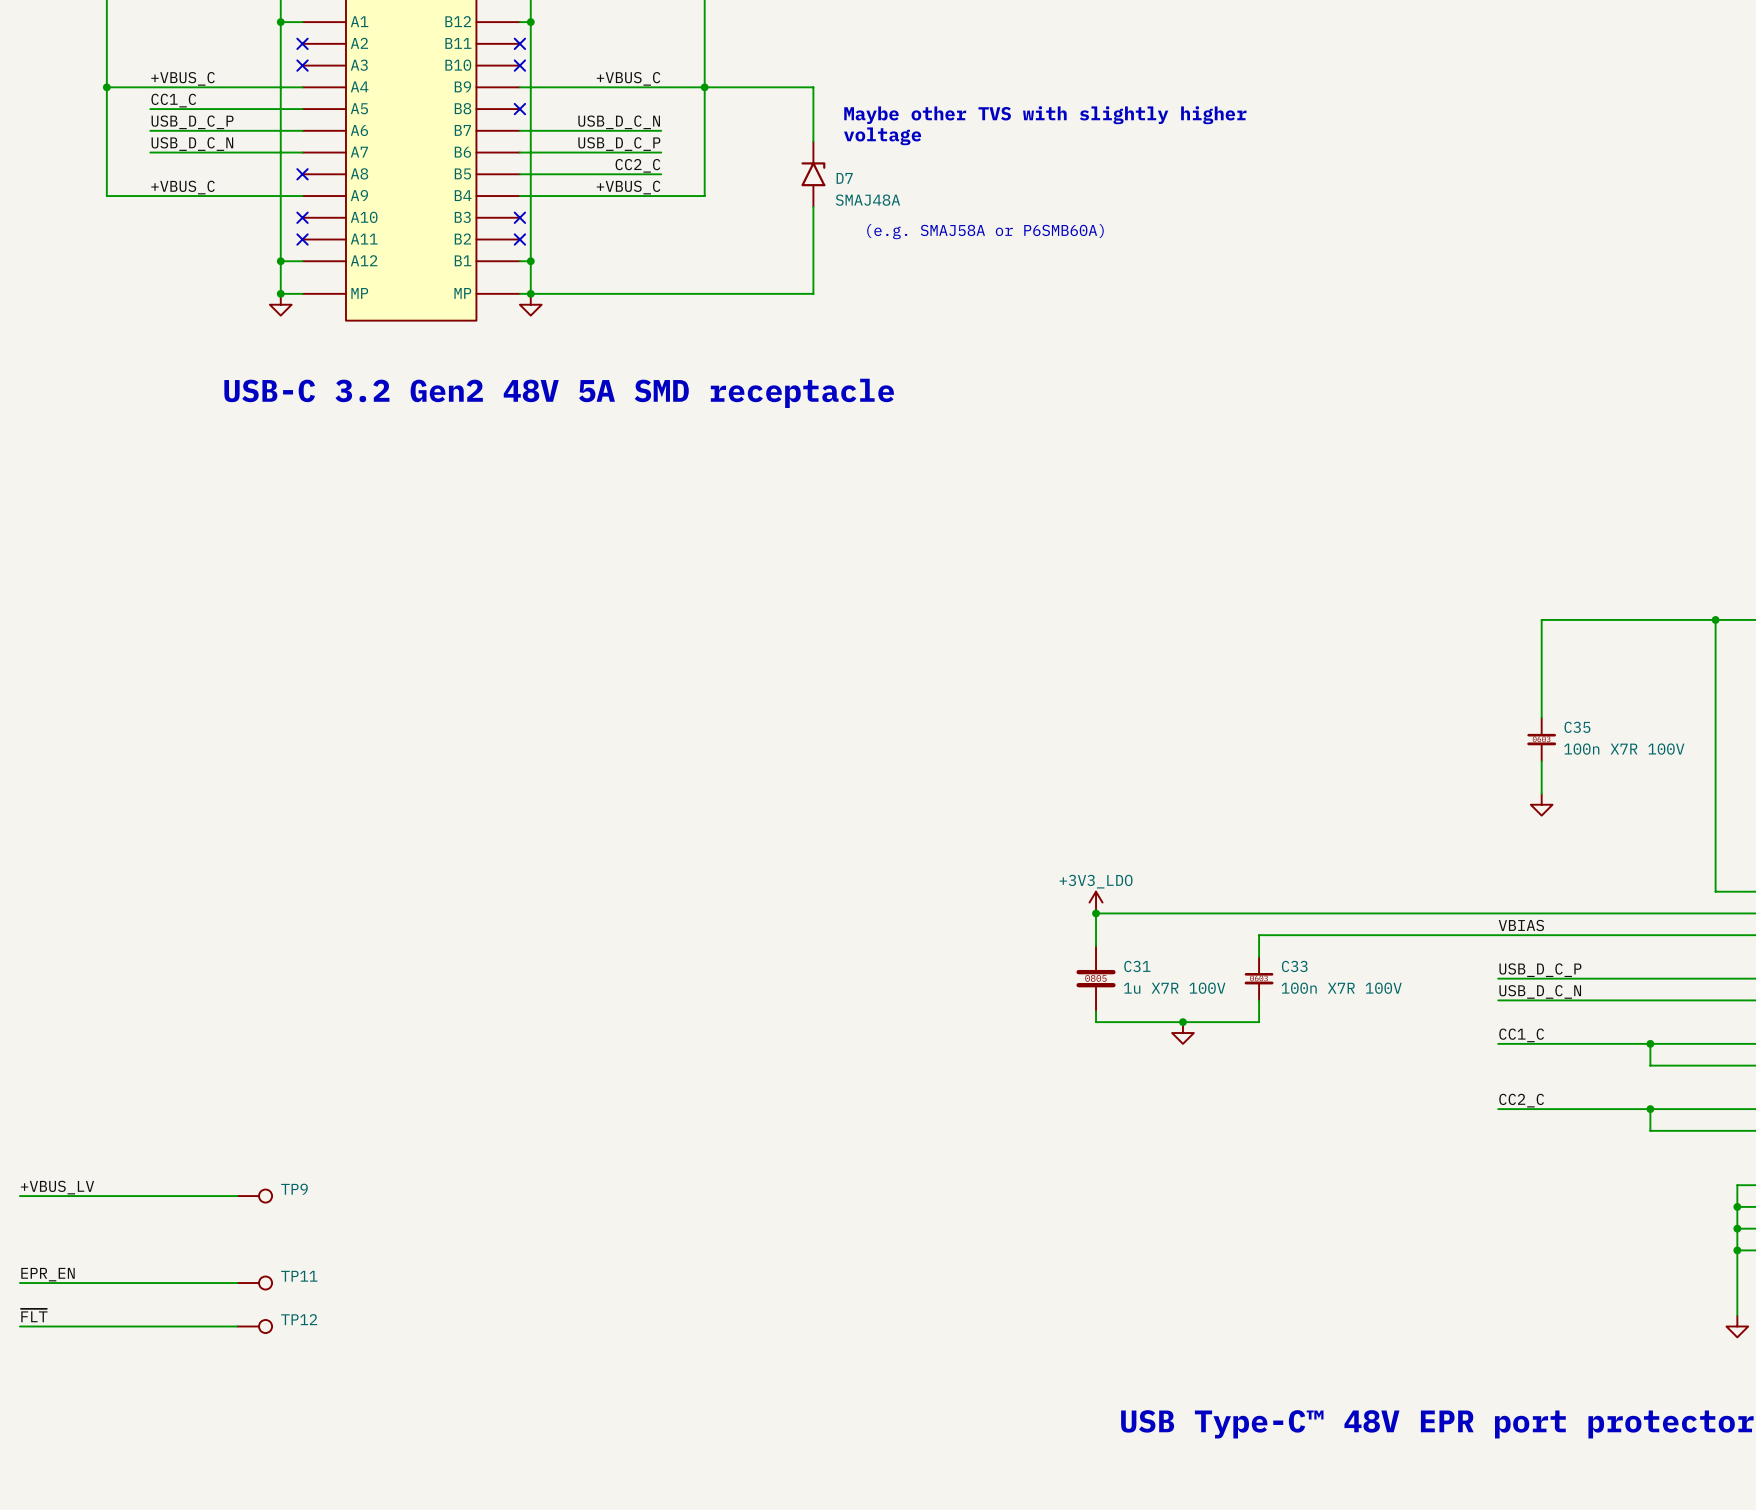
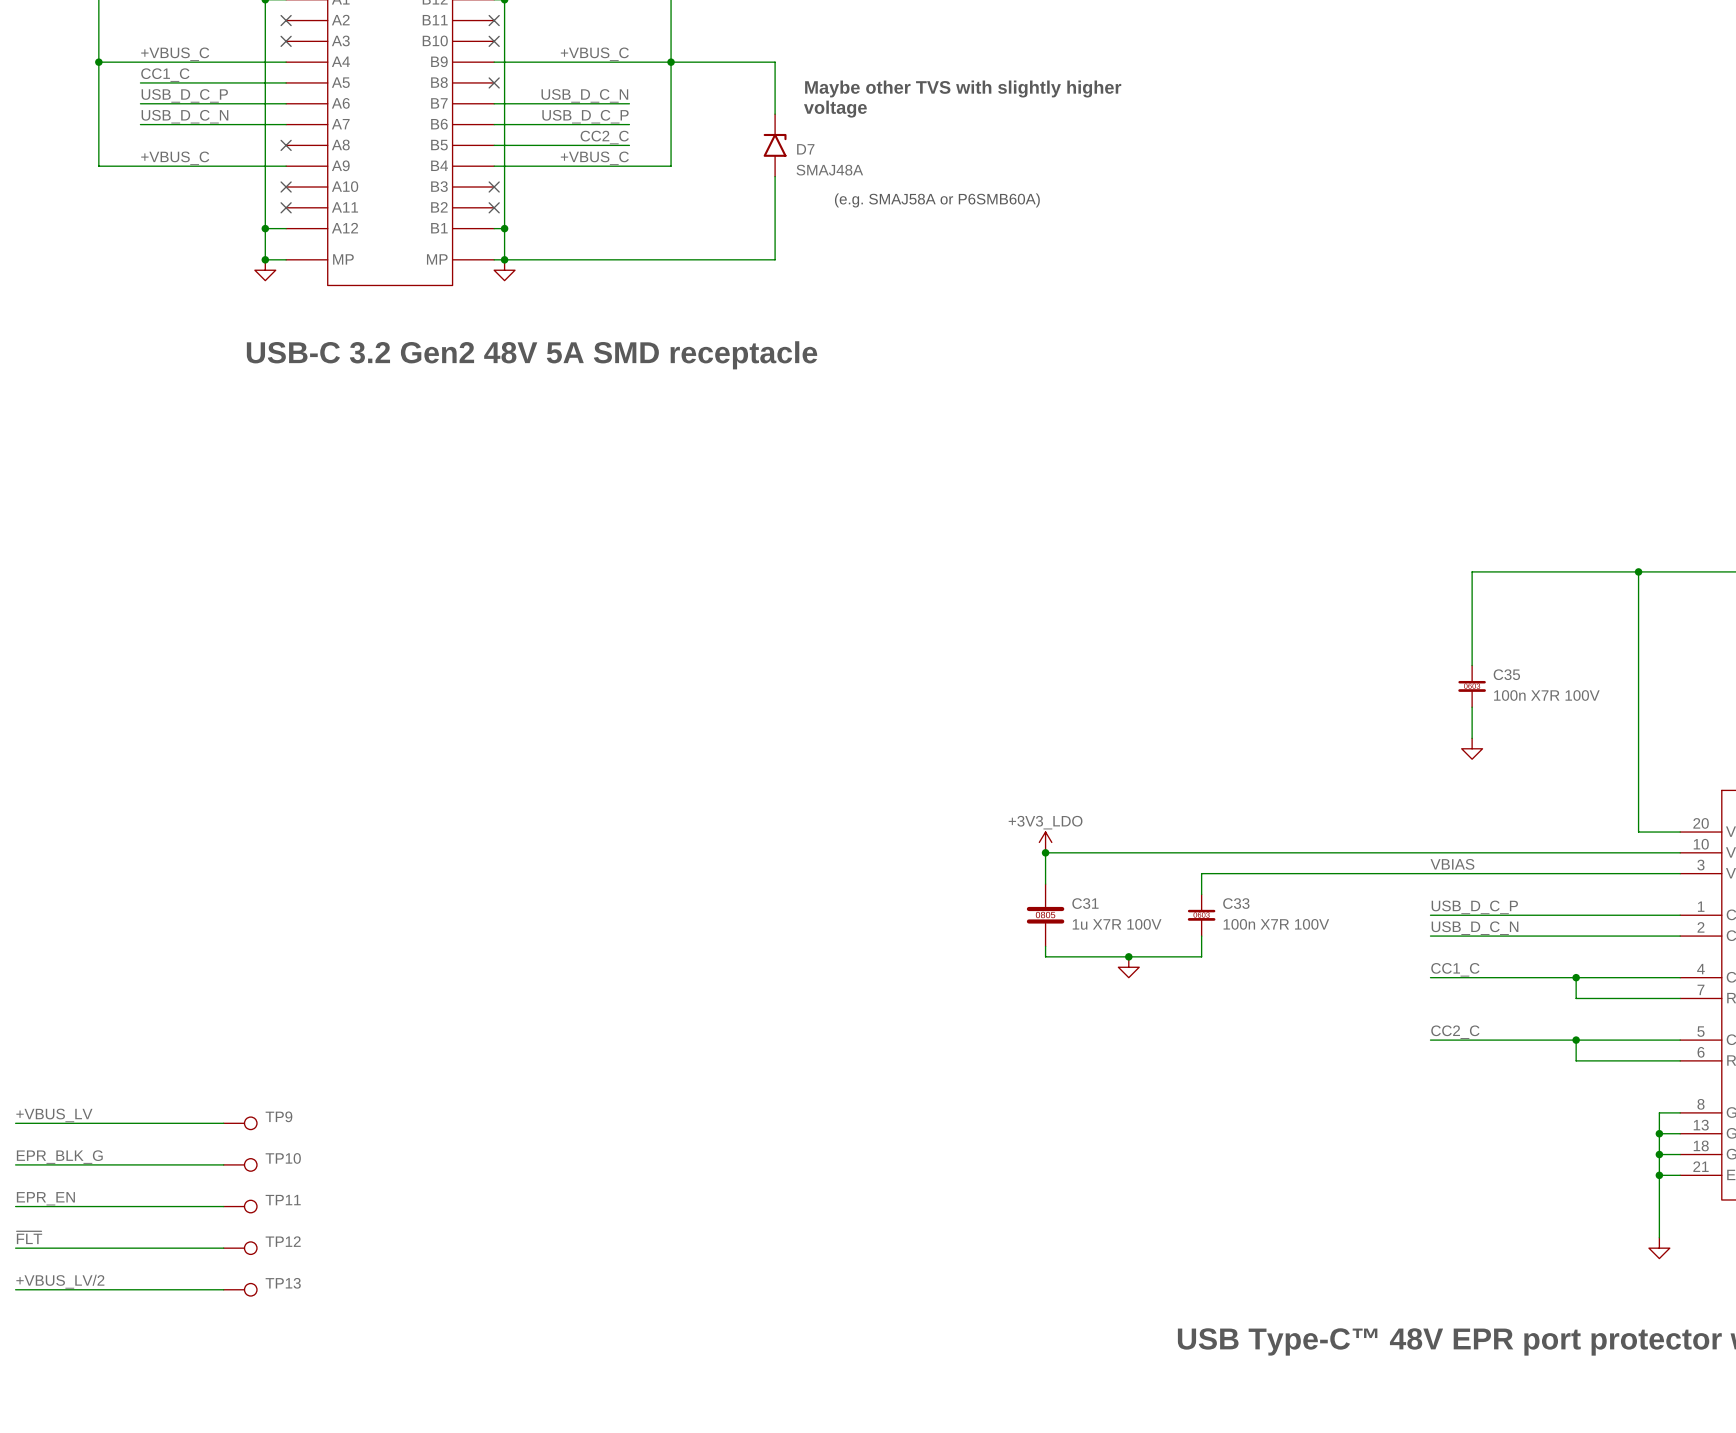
label: none -> EPR_BLK_G (59, 1157)
wire: none -> (15, 1164) (223, 1164)
TP10: none -> (240, 1164)
label: none -> +VBUS_LV/2 (60, 1281)
wire: none -> (15, 1289) (223, 1289)
TP13: none -> (240, 1289)

